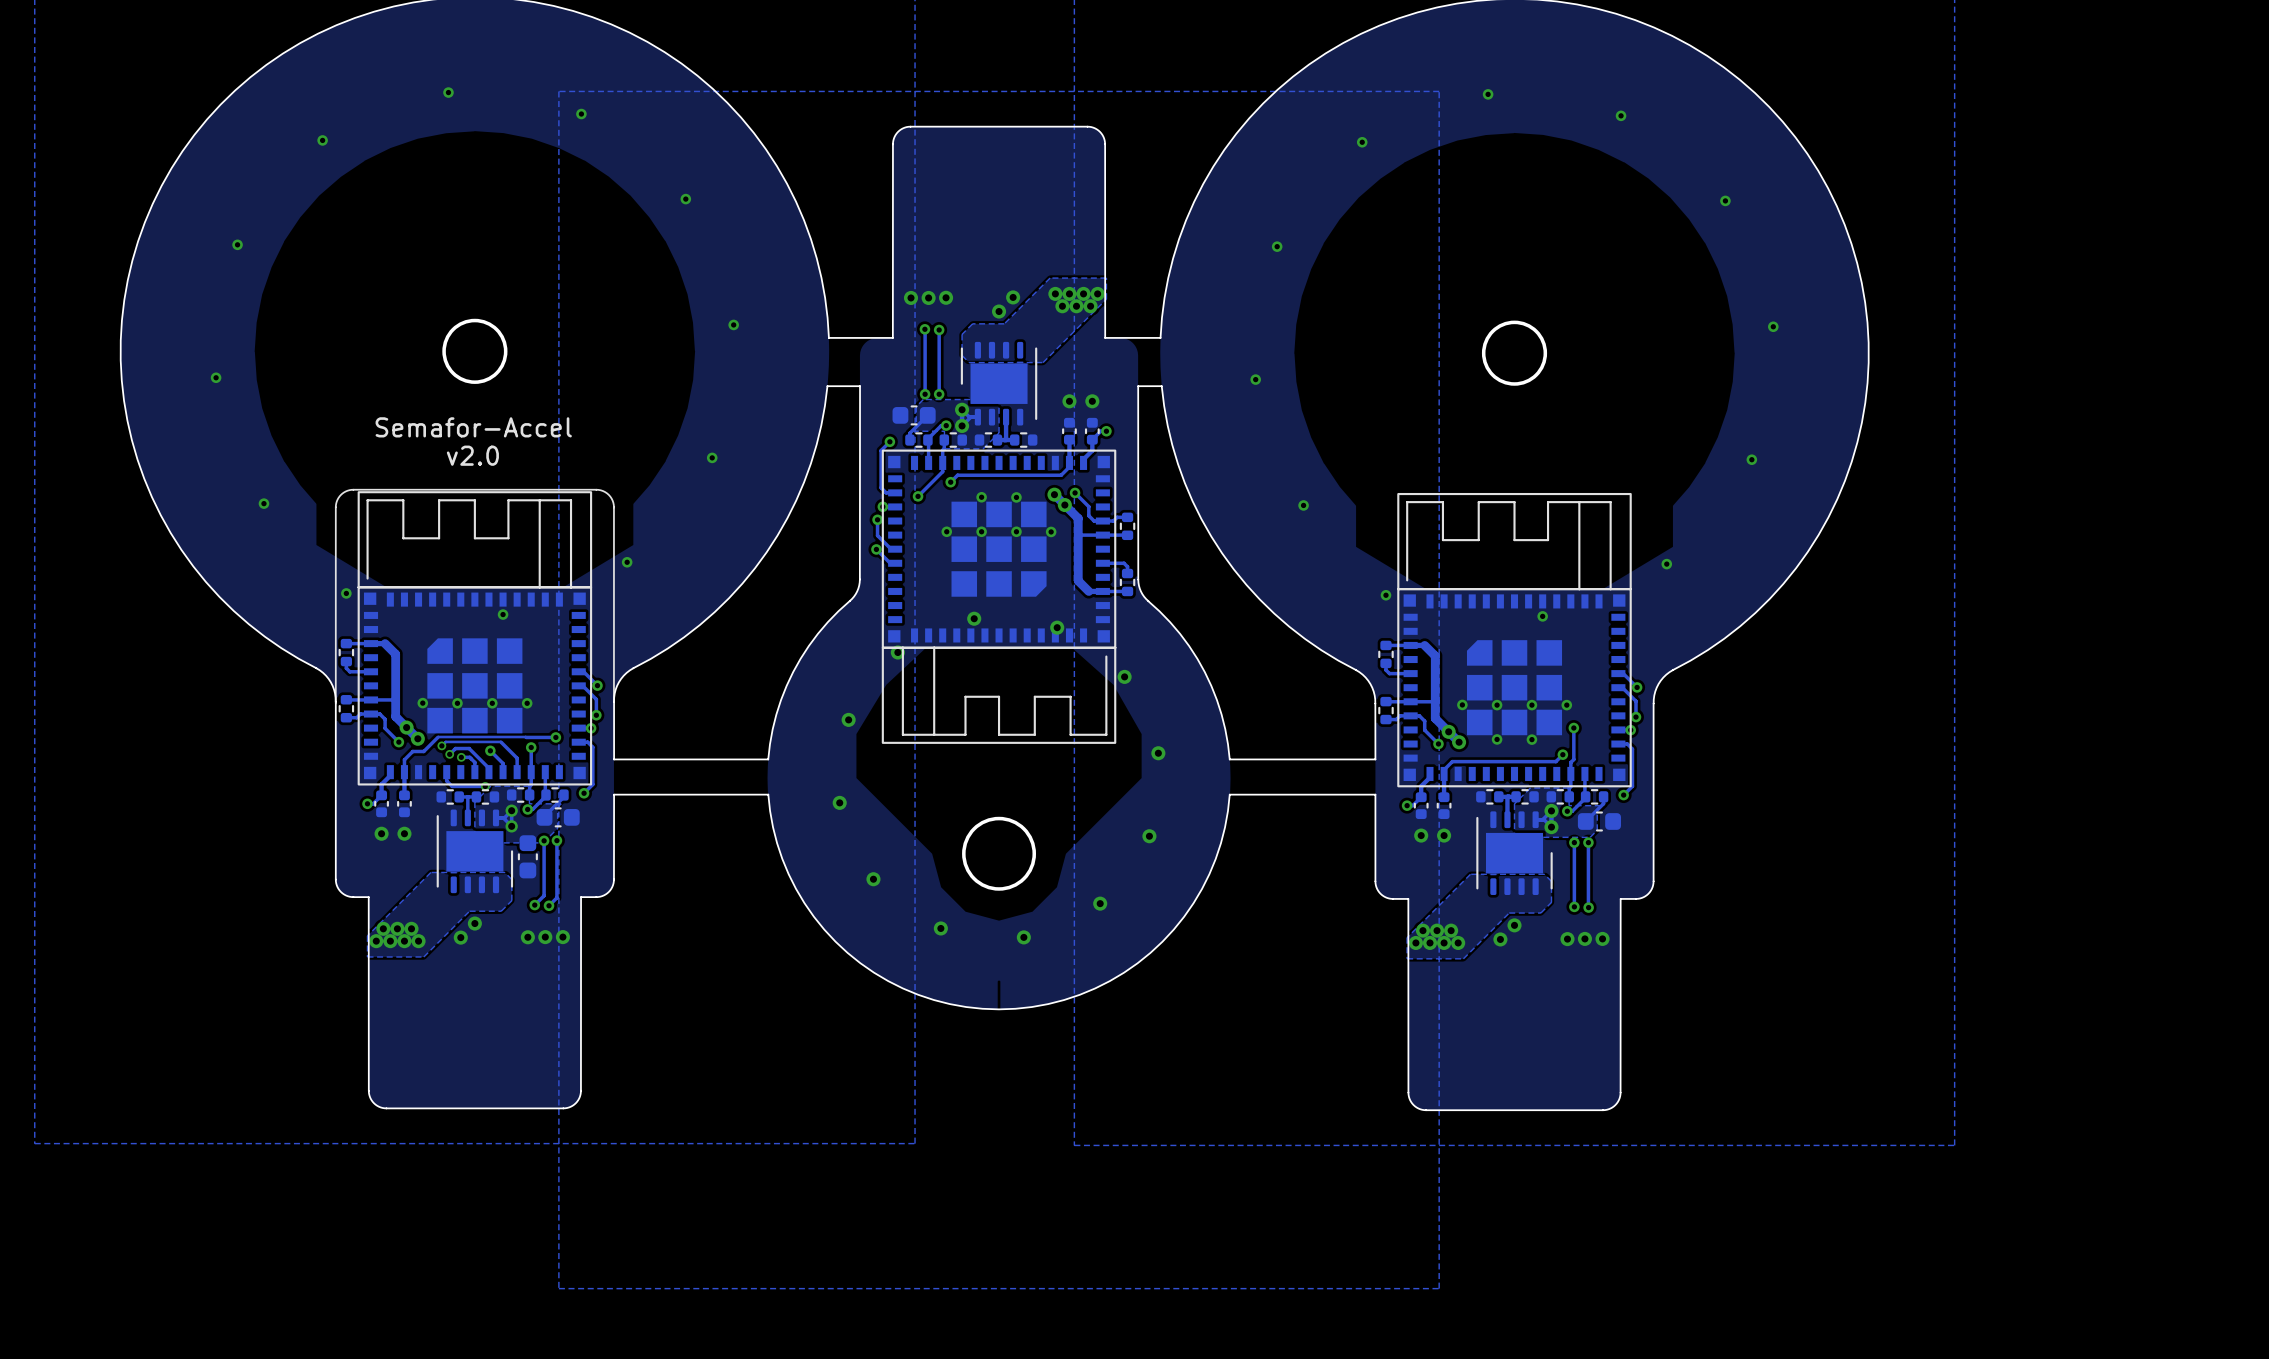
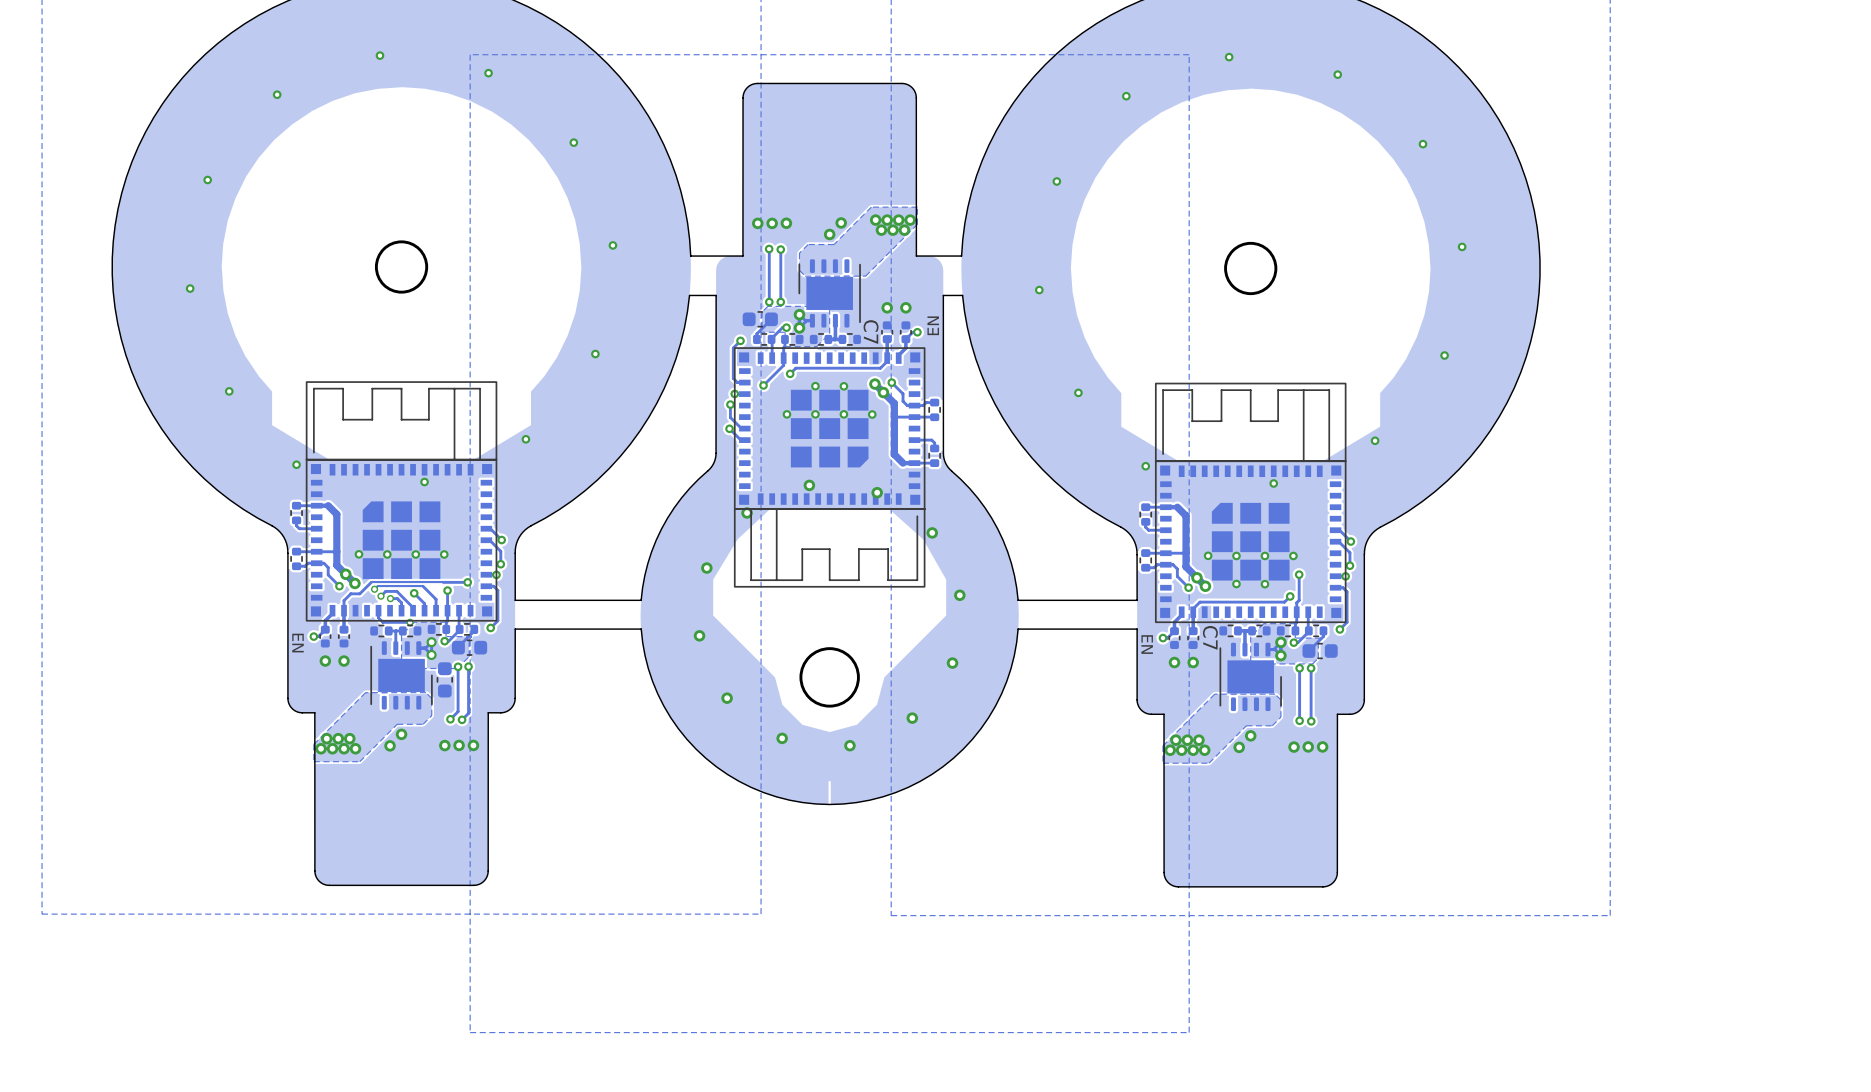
text: none -> EN (933, 325)
text: Semafor-Accel (473, 427) -> none
C7 name: none -> C7 (871, 331)
text: v2.0 (472, 455) -> none
line: (613, 701) (613, 507) (611, 498) (607, 493) (596, 489) (353, 489) (342, 493) (335, 505) (335, 703) -> none
C7 name: none -> C7 (1210, 637)
text: none -> EN (298, 643)
text: none -> EN (1147, 644)

